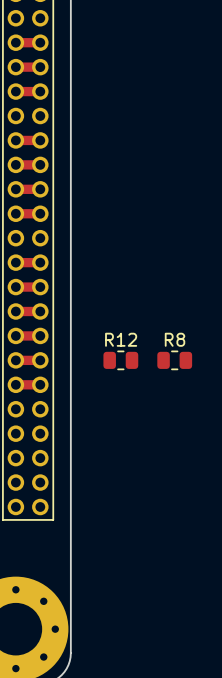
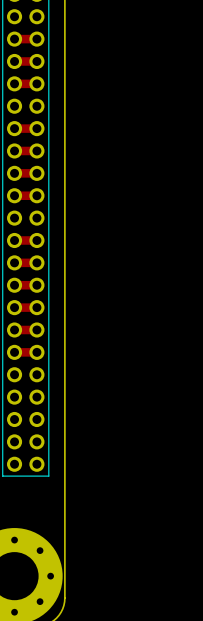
R12: (120, 360) -> none
R8: (174, 360) -> none

